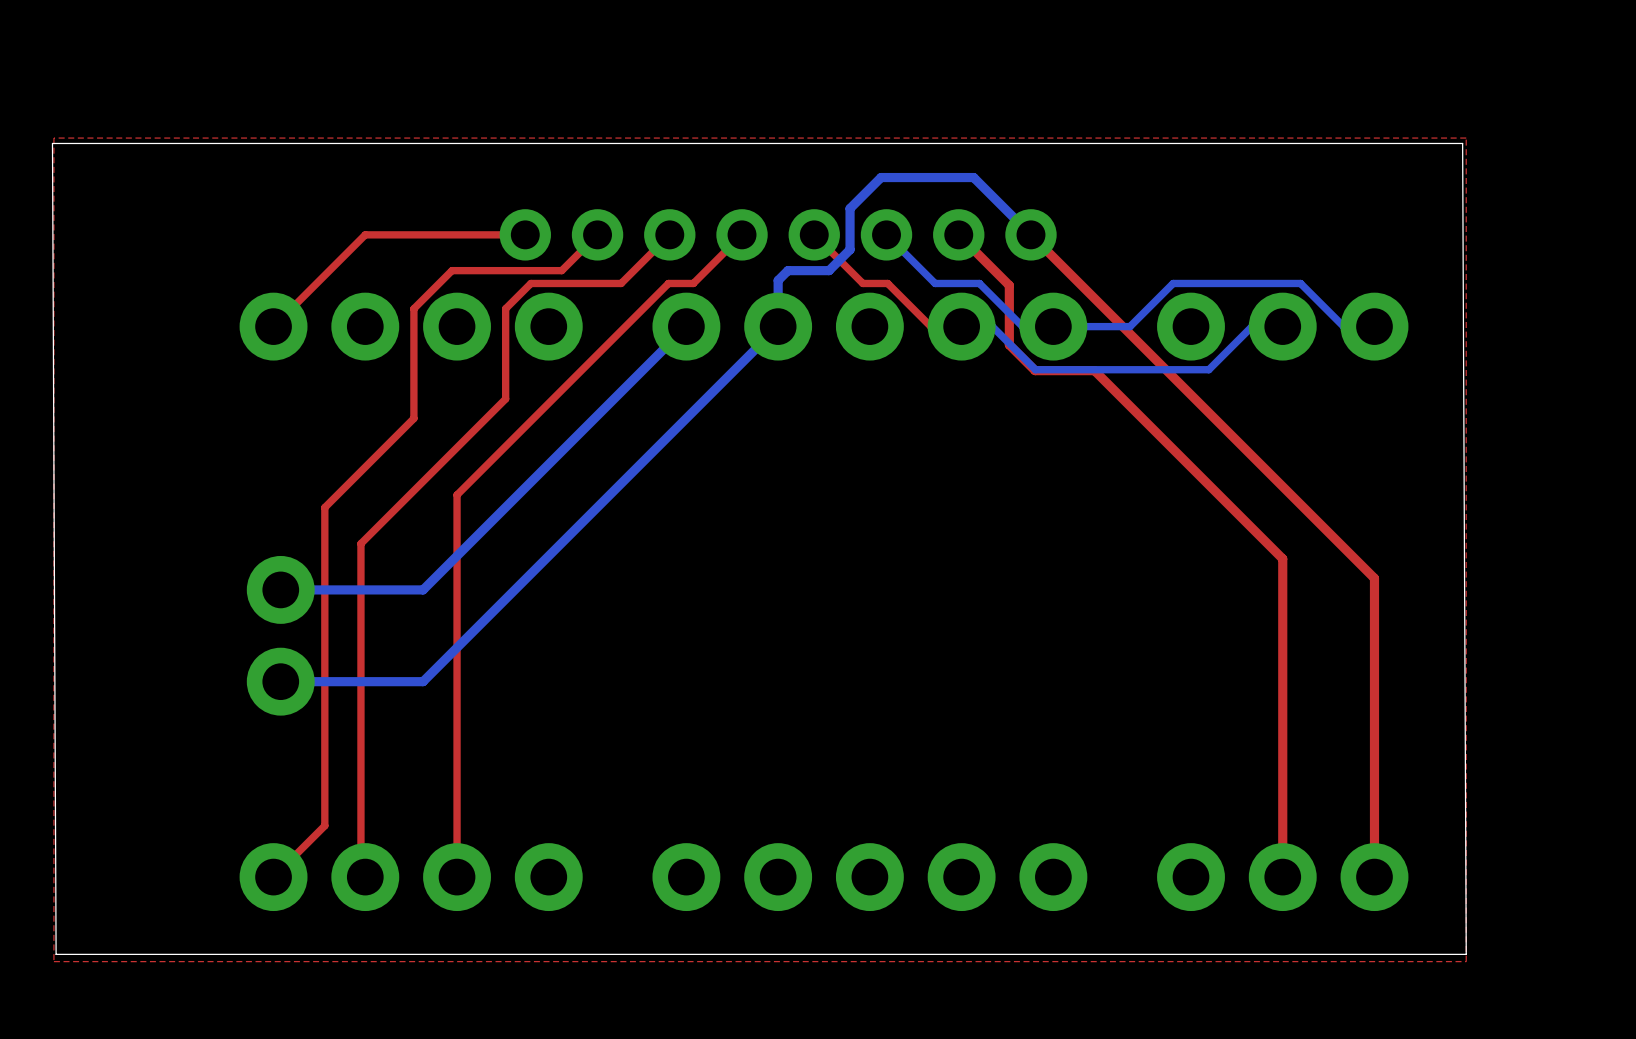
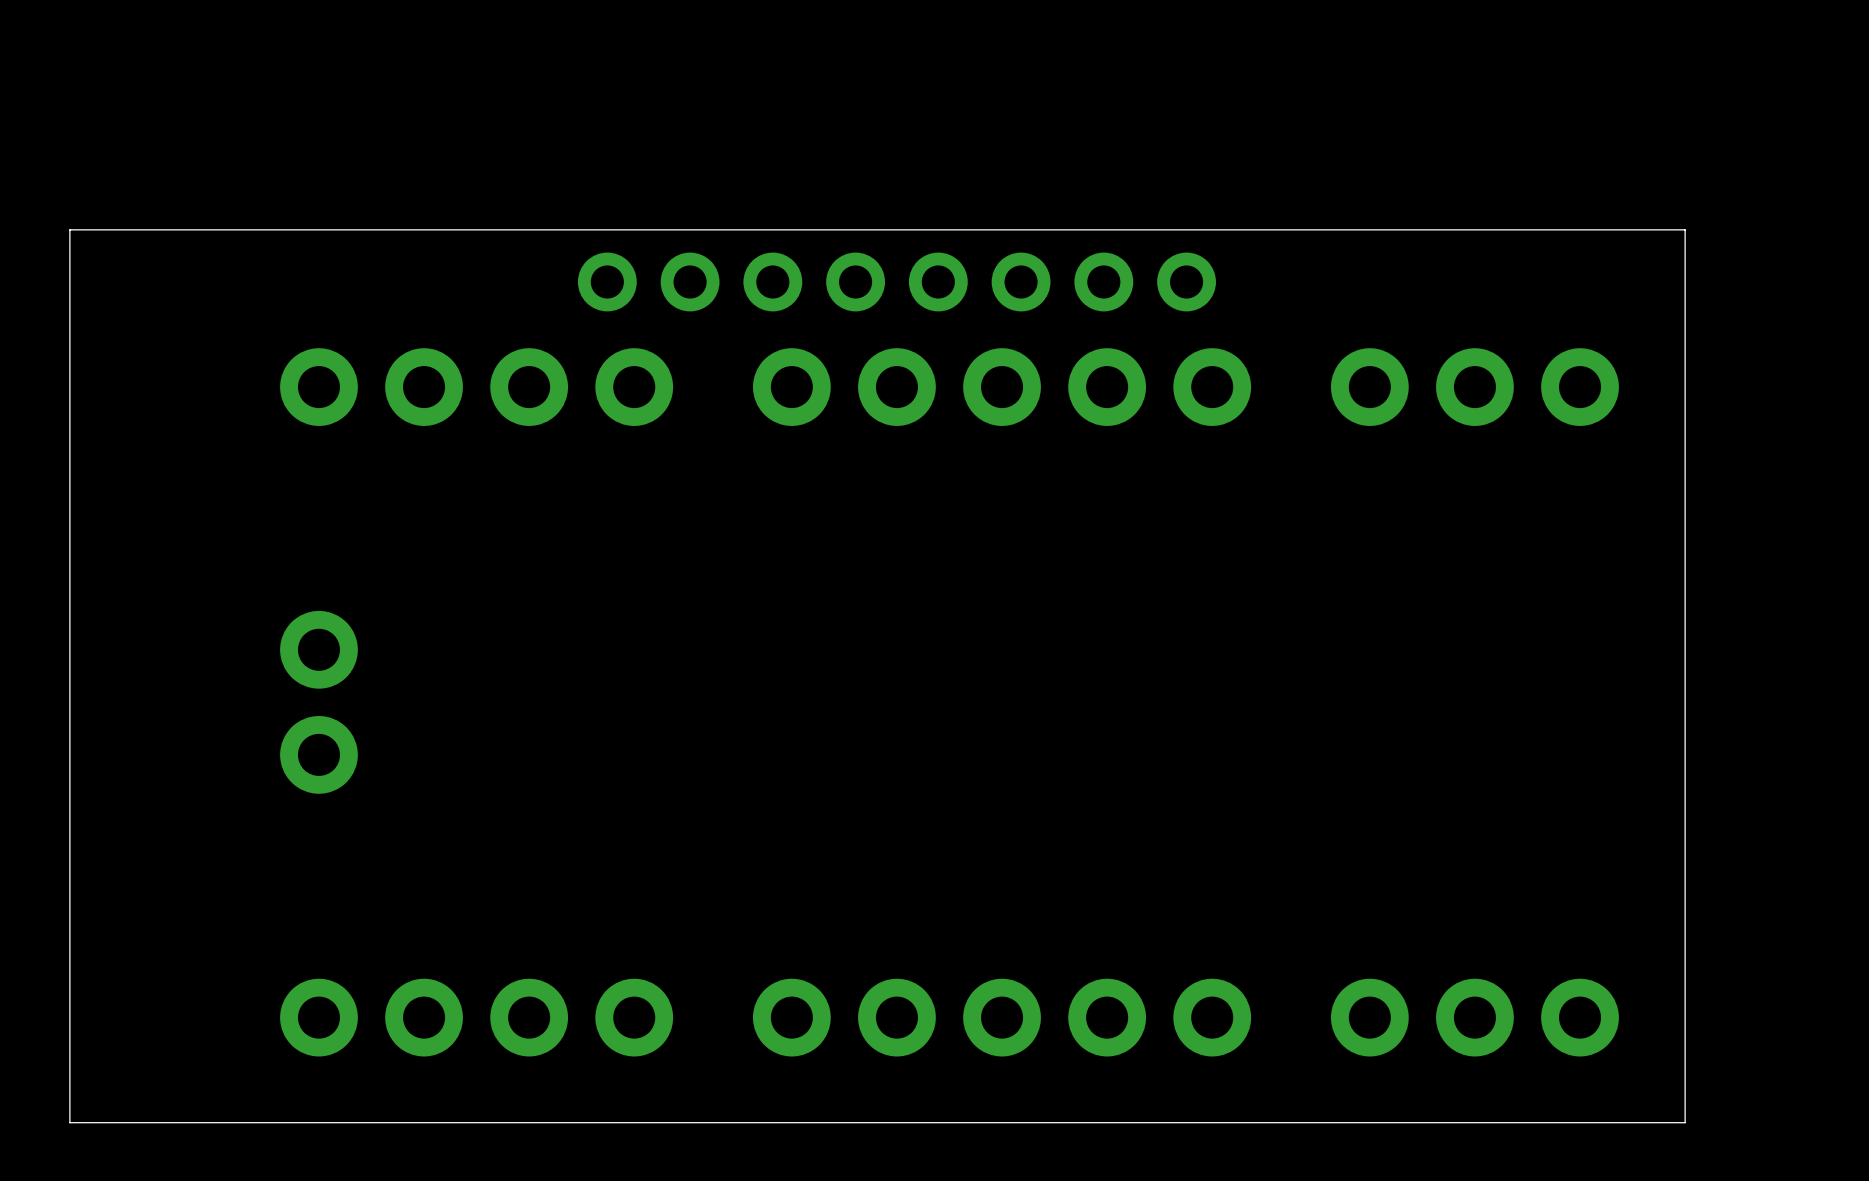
top zone outline: (1466, 138) (53, 138) (53, 961) (1466, 961) (1466, 138) -> none
board edge: (1462, 143) (52, 143) (56, 954) (1466, 954) (1462, 143) -> (1685, 229) (1685, 1122) (69, 1122) (69, 229) (1685, 229)
top track: (525, 234) (365, 234) (273, 326) -> none
top track: (597, 234) (561, 270) (452, 270) (413, 308) (413, 418) (324, 507) (324, 825) (273, 877) -> none
top track: (669, 234) (621, 283) (530, 283) (505, 308) (505, 398) (360, 543) (360, 900) -> none
top track: (742, 234) (693, 283) (668, 283) (457, 494) (457, 877) -> none
top track: (814, 234) (862, 283) (887, 283) (930, 326) (961, 326) -> none
bottom track: (886, 234) (935, 283) (979, 283) (1022, 326) (1130, 326) (1173, 283) (1300, 283) (1343, 326) (1374, 326) -> none
top track: (958, 234) (1009, 285) (1009, 344) (1035, 370) (1094, 370) (1282, 558) (1282, 877) -> none
bottom track: (1030, 234) (973, 177) (881, 177) (850, 208) (850, 249) (829, 270) (787, 270) (778, 280) (778, 326) (423, 681) (280, 681) -> none
top track: (1030, 234) (1374, 578) (1374, 877) -> none
bottom track: (686, 326) (423, 589) (280, 589) -> none
bottom track: (1282, 326) (1251, 326) (1208, 369) (1035, 369) (992, 326) (961, 326) -> none
part position: (280, 635) -> (318, 702)

